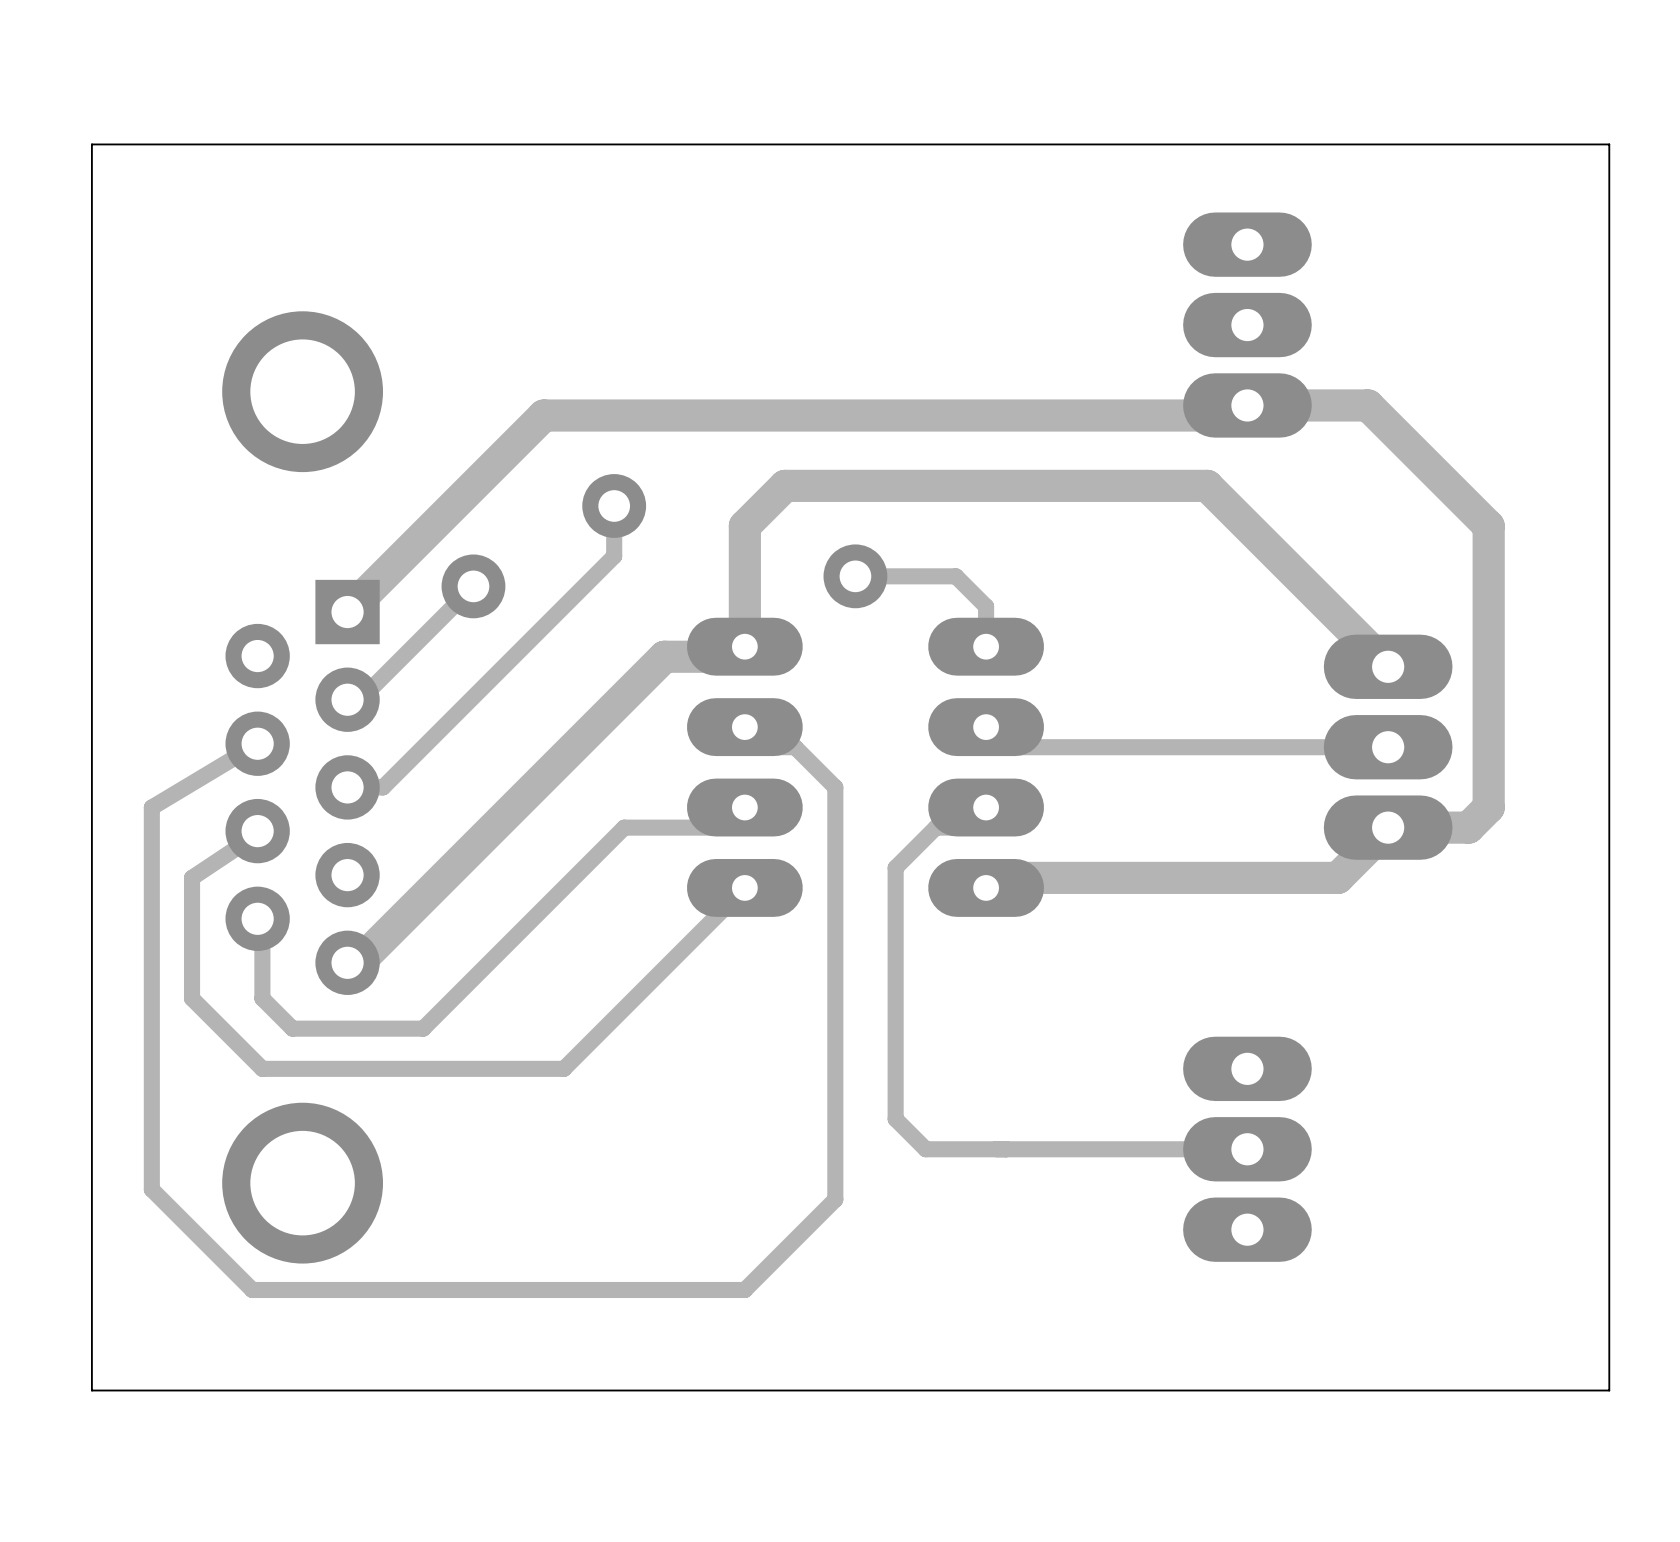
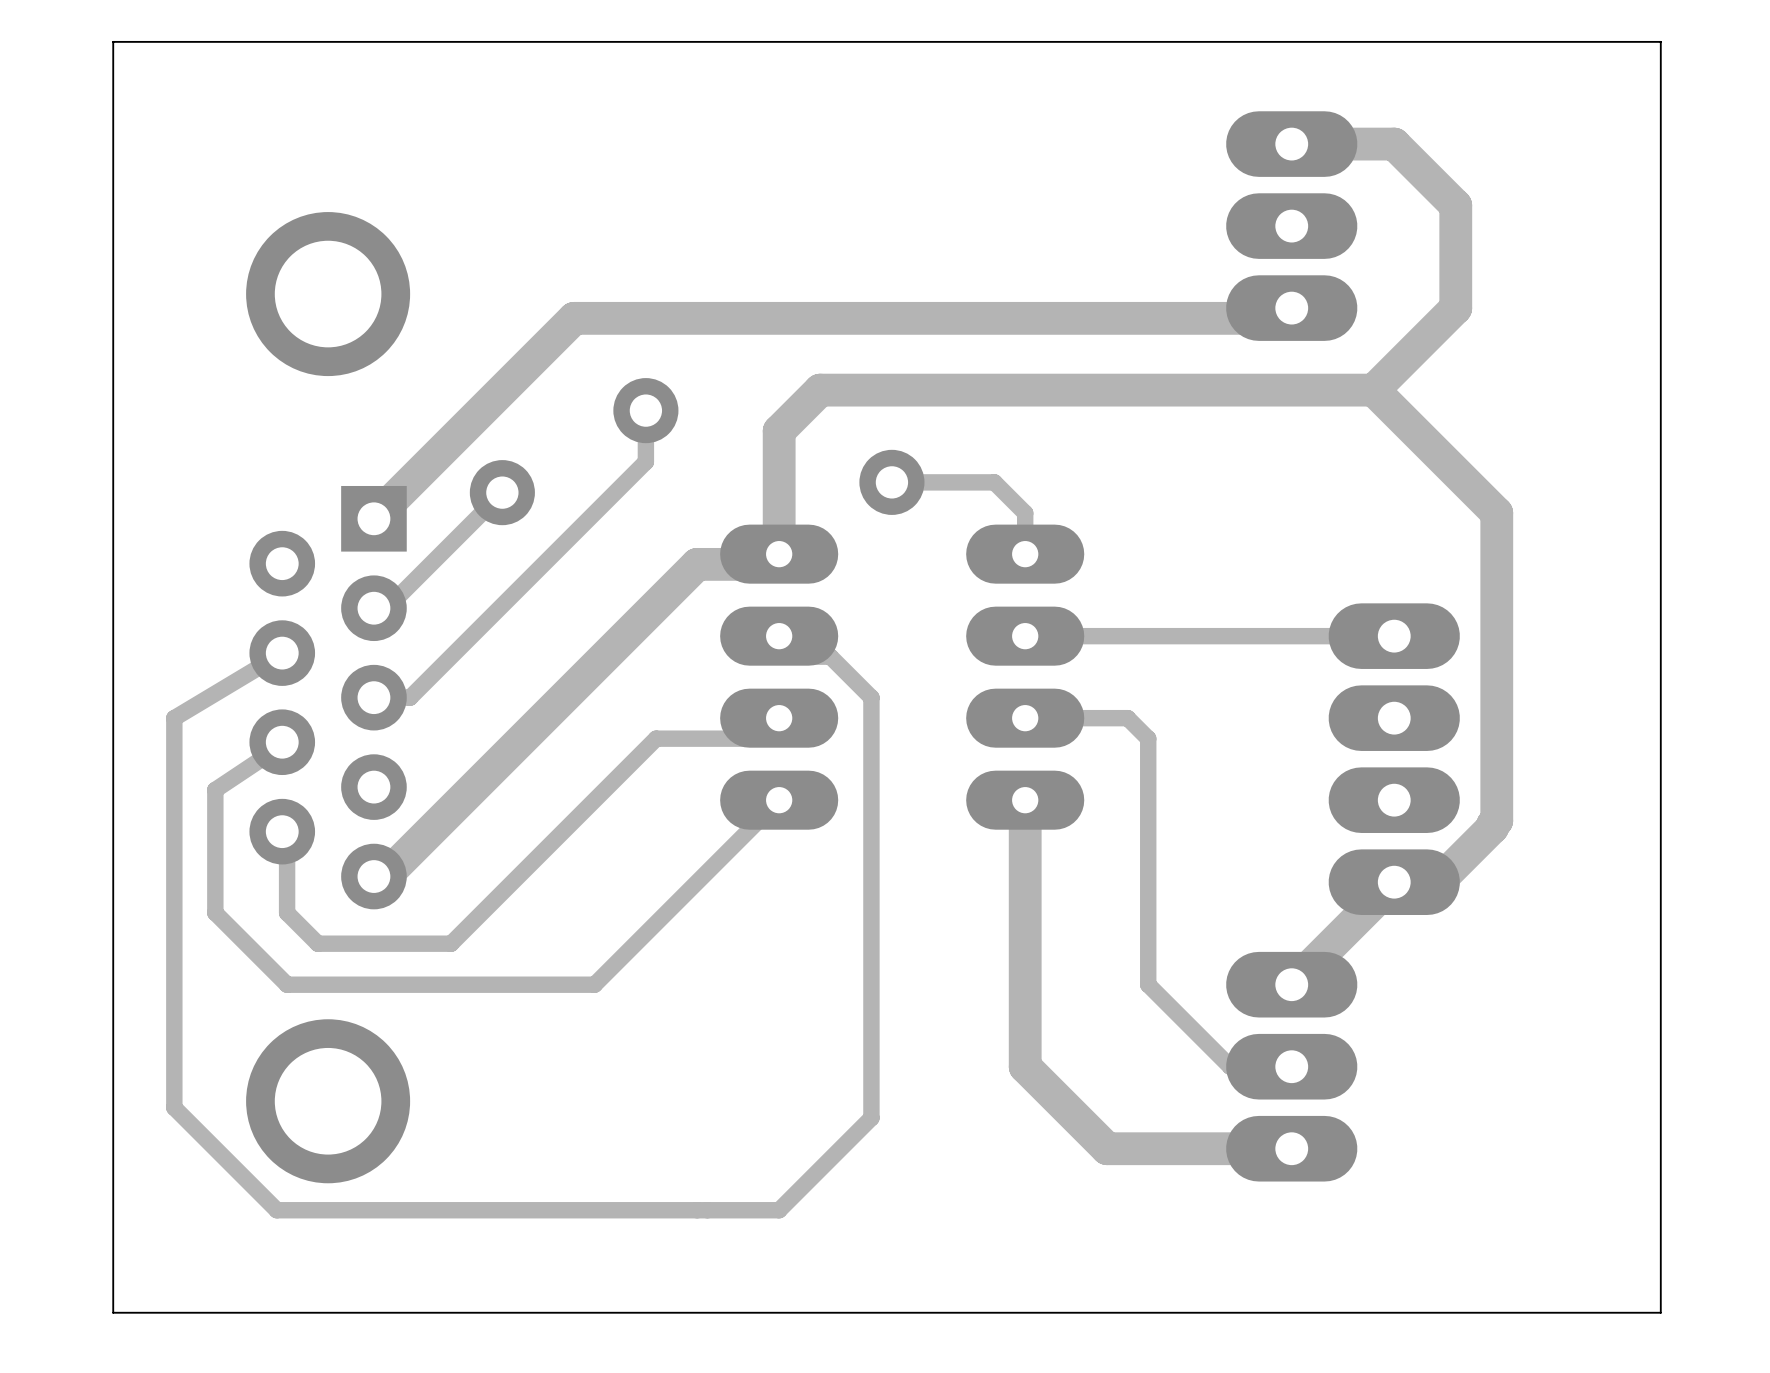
track: none -> (1291, 144) (1394, 144) (1455, 205) (1455, 308) (1373, 390)
track: (1247, 405) (1368, 405) (1488, 526) (1488, 807) (1468, 827) (1388, 827) -> none
track: (1207, 485) (1388, 666) -> (1250, 390) (1373, 390)
track: none -> (1373, 390) (1496, 513) (1496, 820) (1492, 827) (1437, 882) (1394, 882) (1291, 984)
track: (986, 727) (1006, 747) (1388, 747) -> (1025, 636) (1394, 636)
part: (1388, 747) -> none
track: (986, 807) (966, 827) (935, 827) (895, 867) (895, 1119) (925, 1149) (1187, 1149) -> (1025, 718) (1127, 718) (1148, 738) (1148, 984) (1230, 1066)
track: (1398, 817) (1337, 877) (996, 877) (986, 887) -> (1291, 1148) (1107, 1148) (1025, 1066) (1025, 800)
part: none -> (1394, 759)

